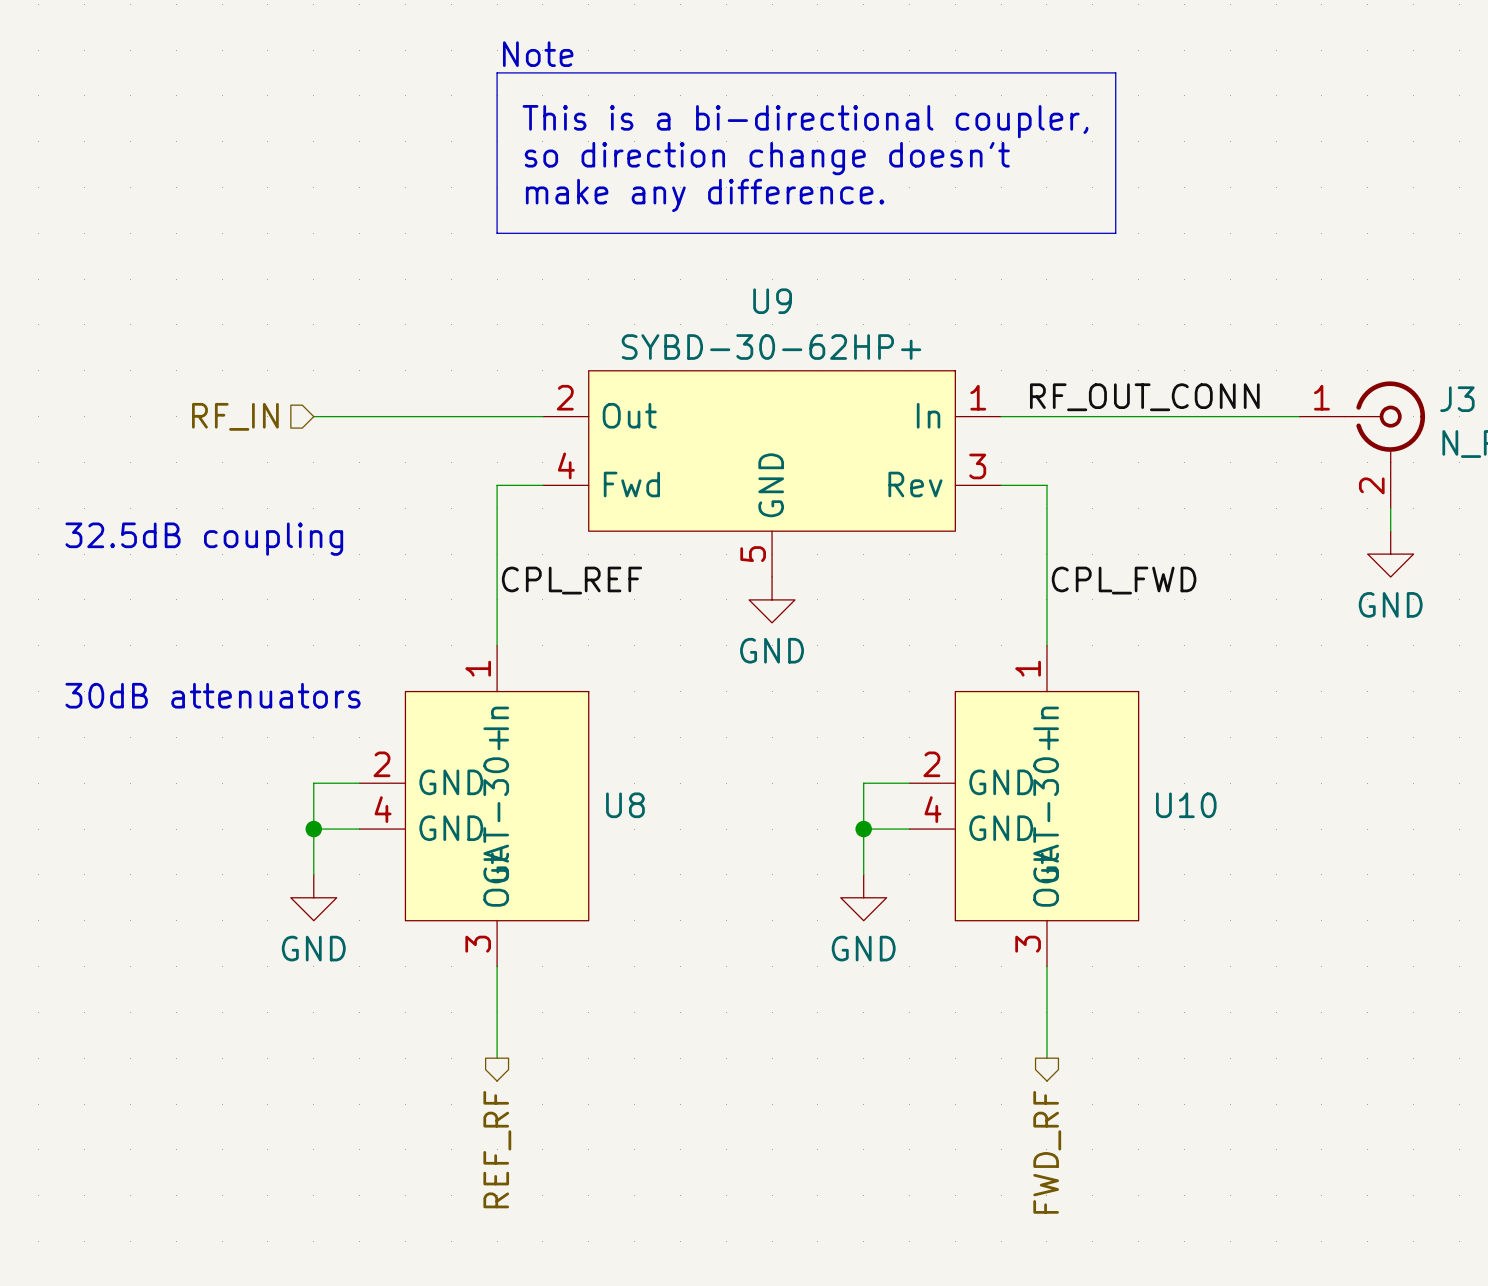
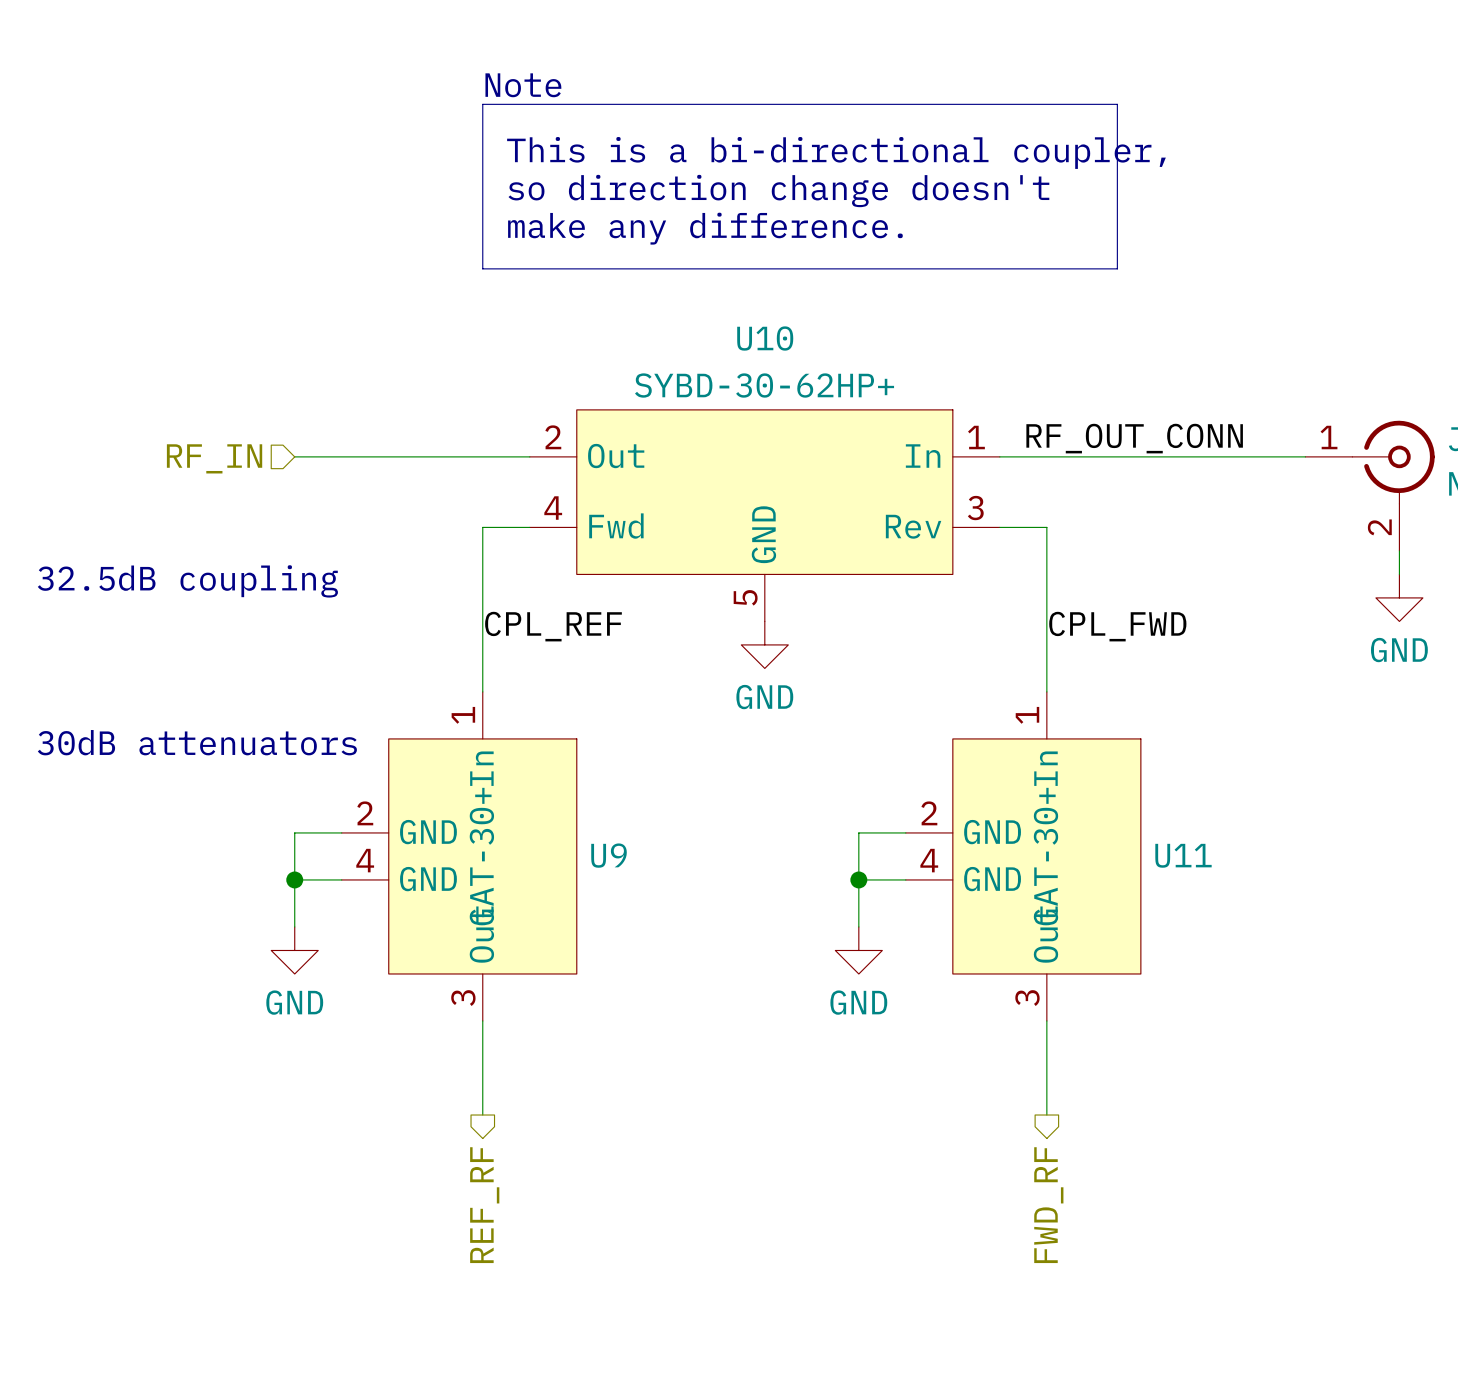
U9 name: U9 (772, 301) -> U10 (765, 338)
U8 name: U8 (625, 805) -> U9 (609, 855)
U10 name: U10 (1186, 805) -> U11 (1183, 855)

